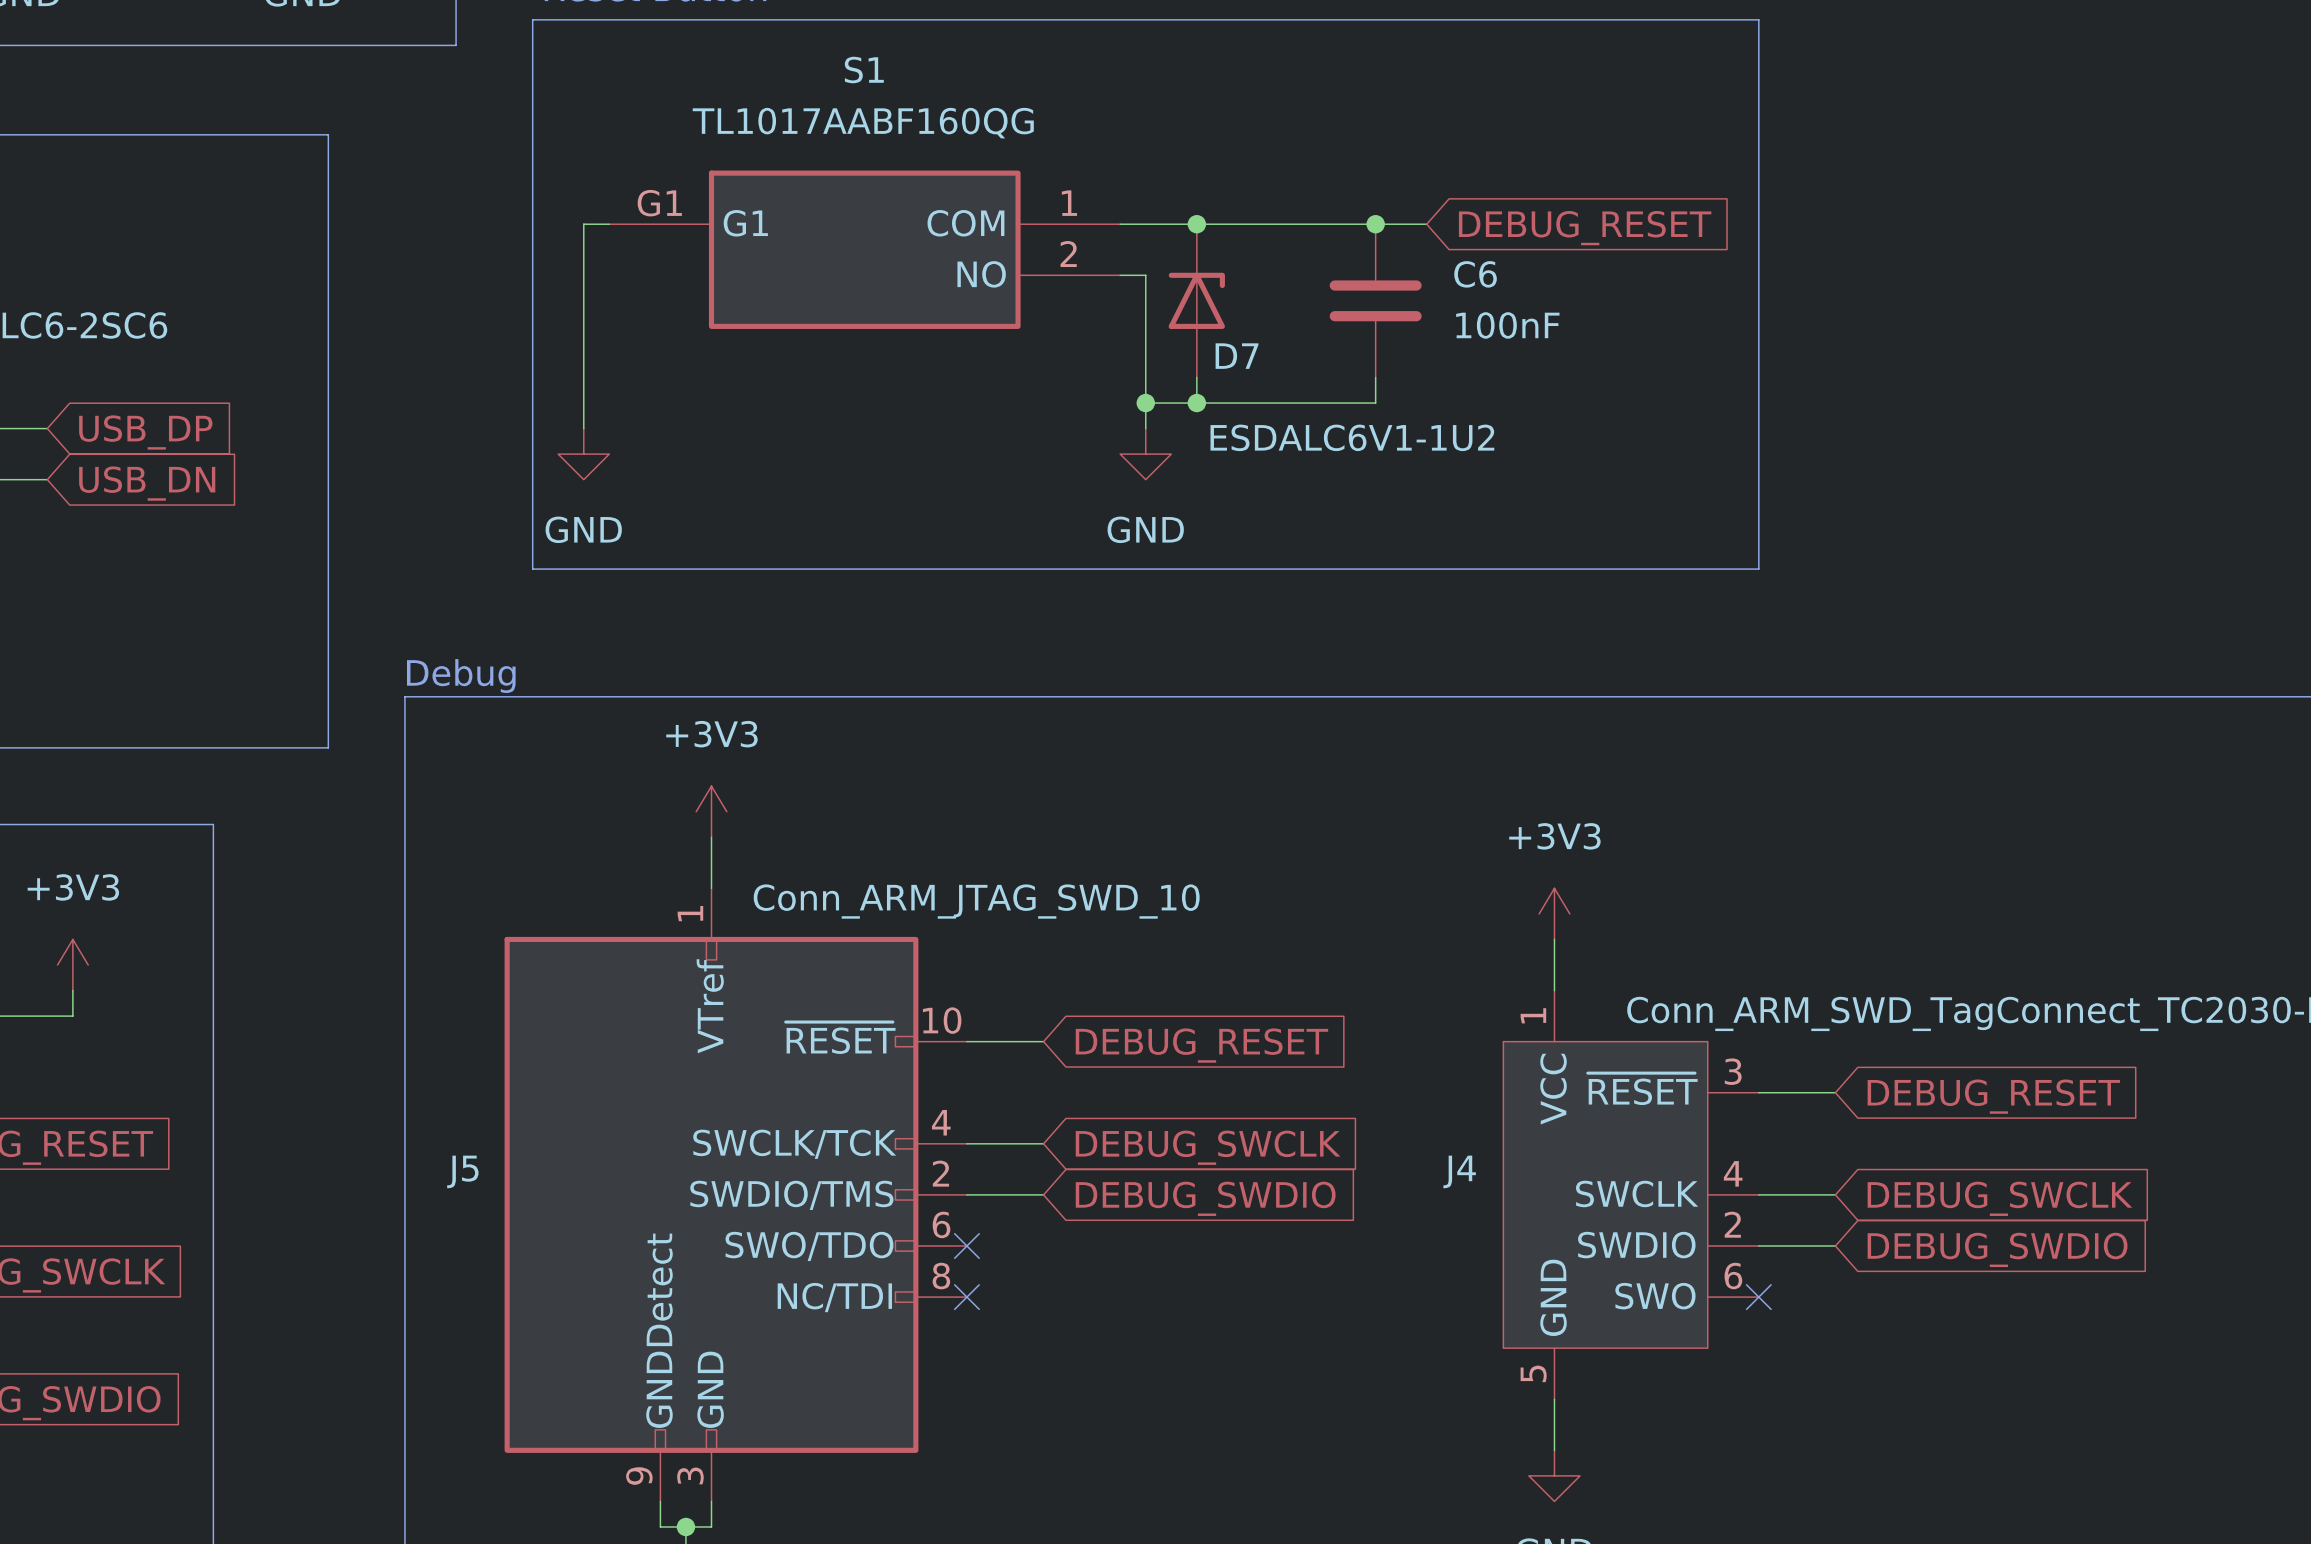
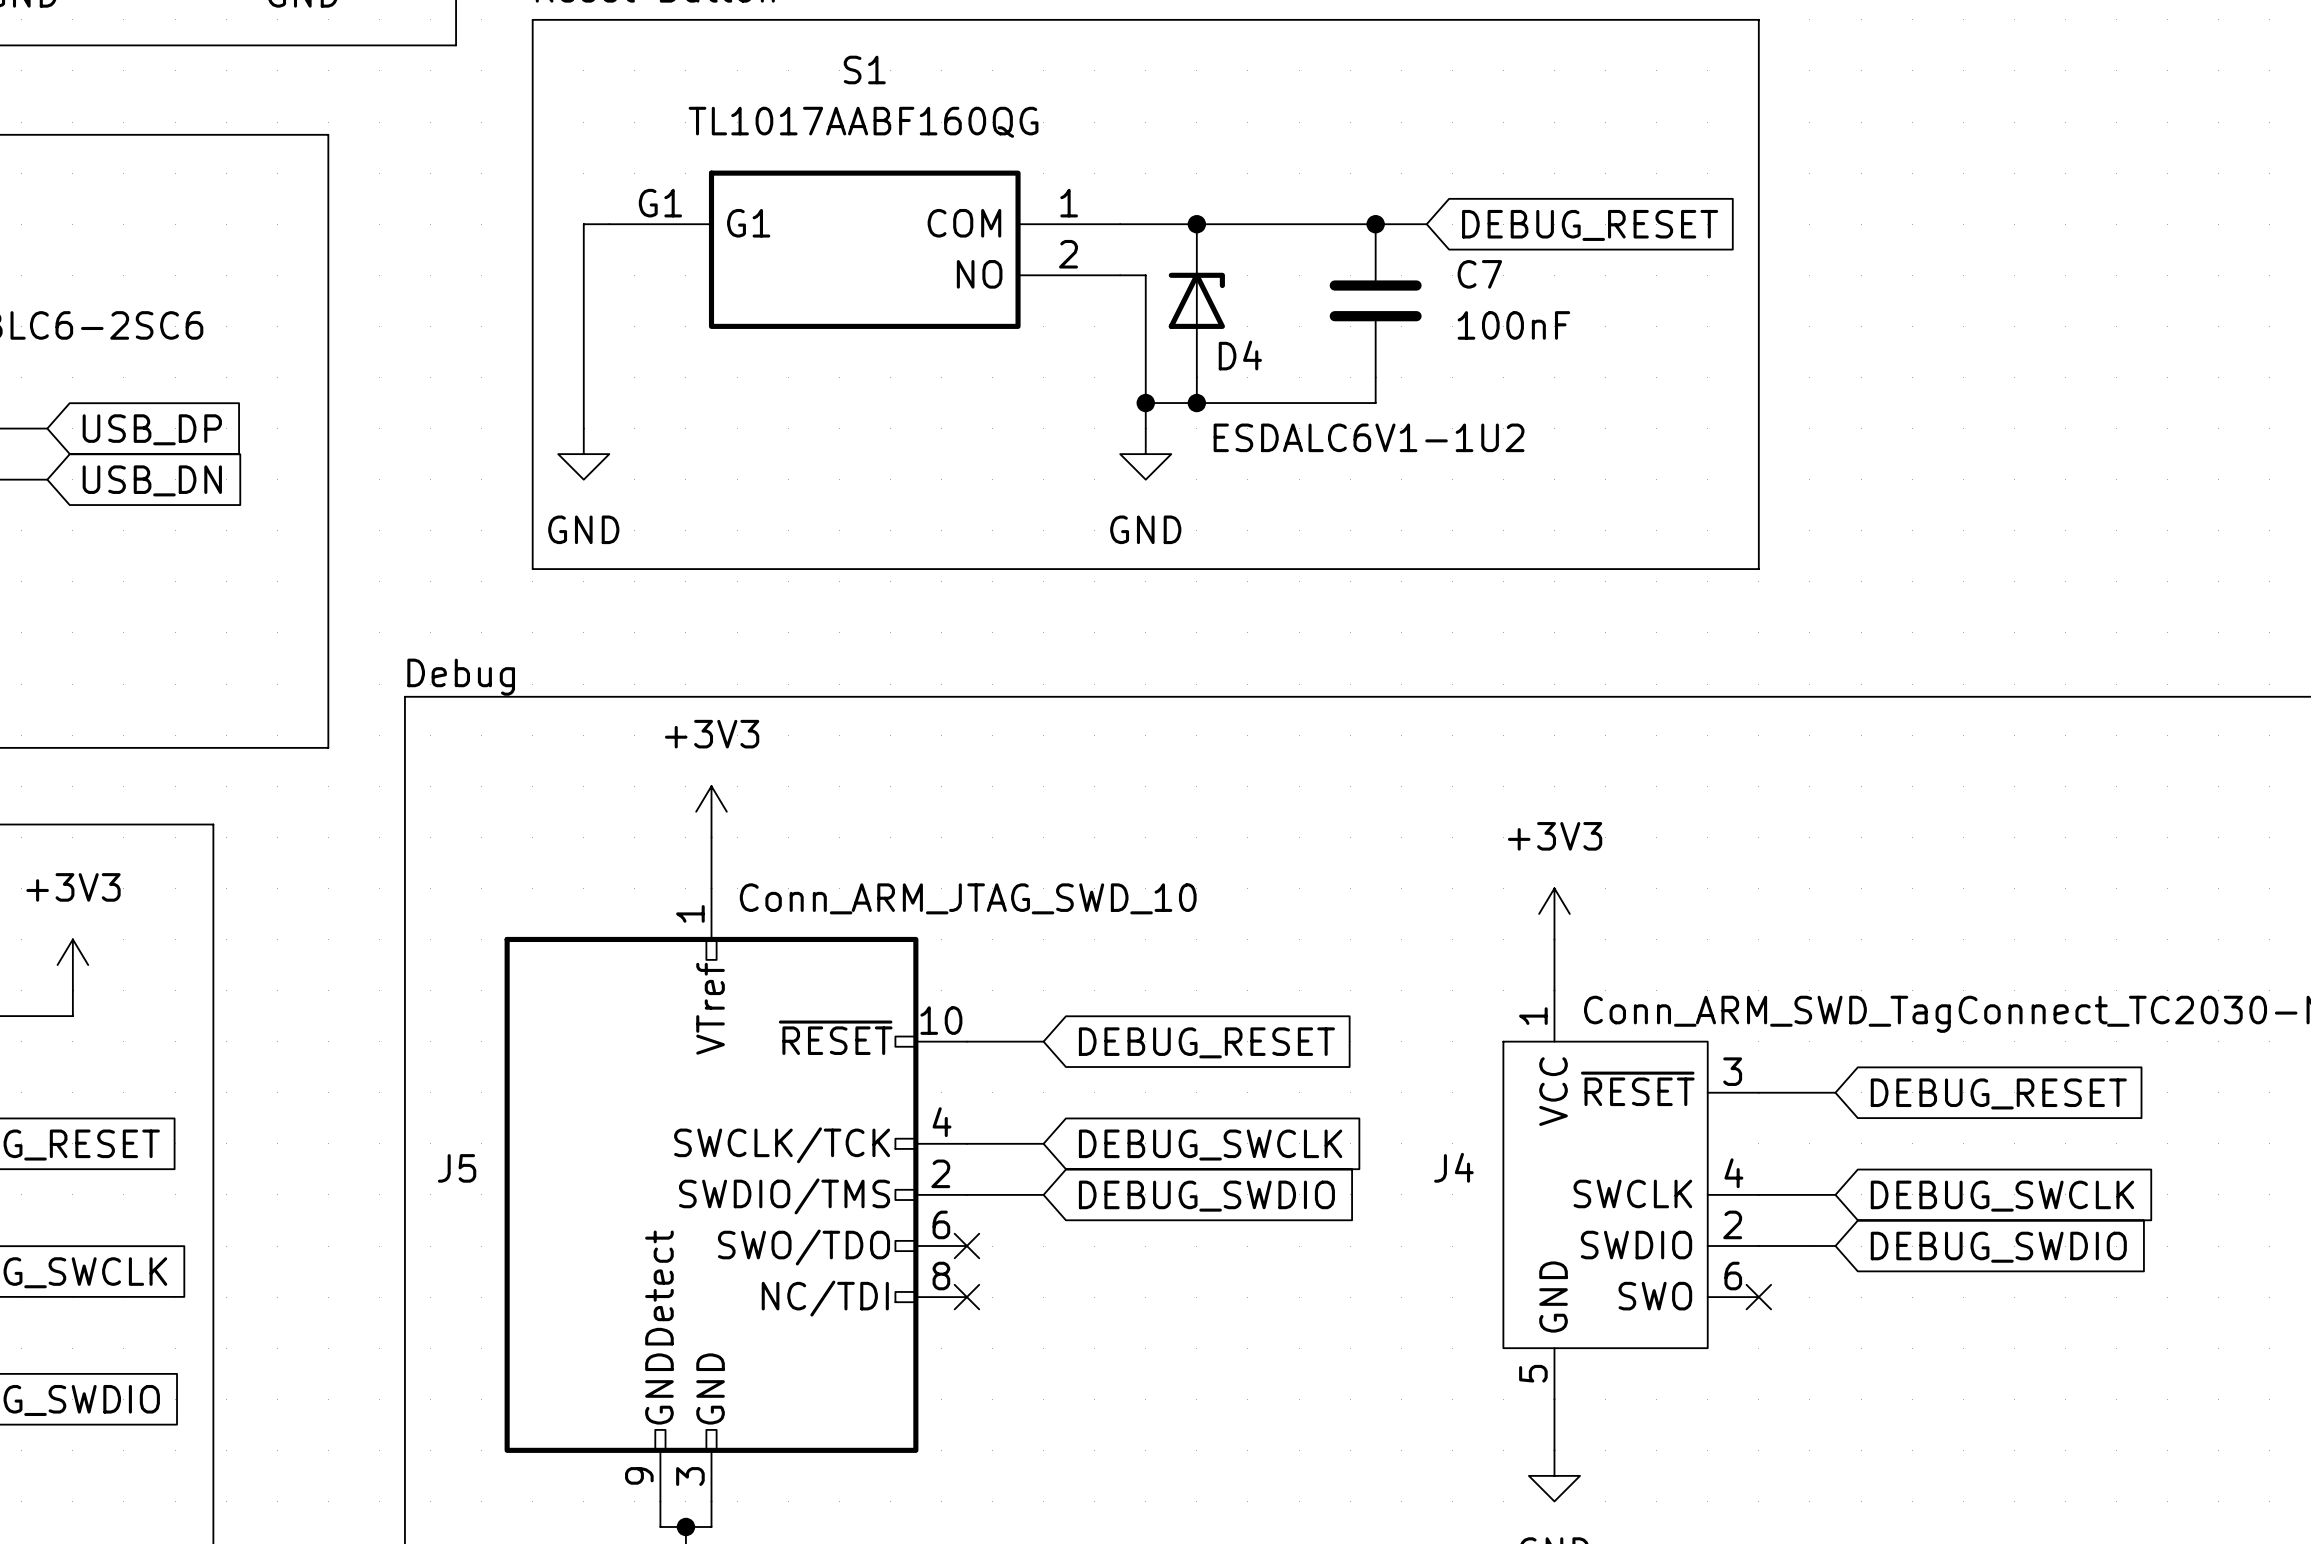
C6 name: C6 (1475, 274) -> C7 (1479, 274)
D7 name: D7 (1237, 356) -> D4 (1240, 355)

